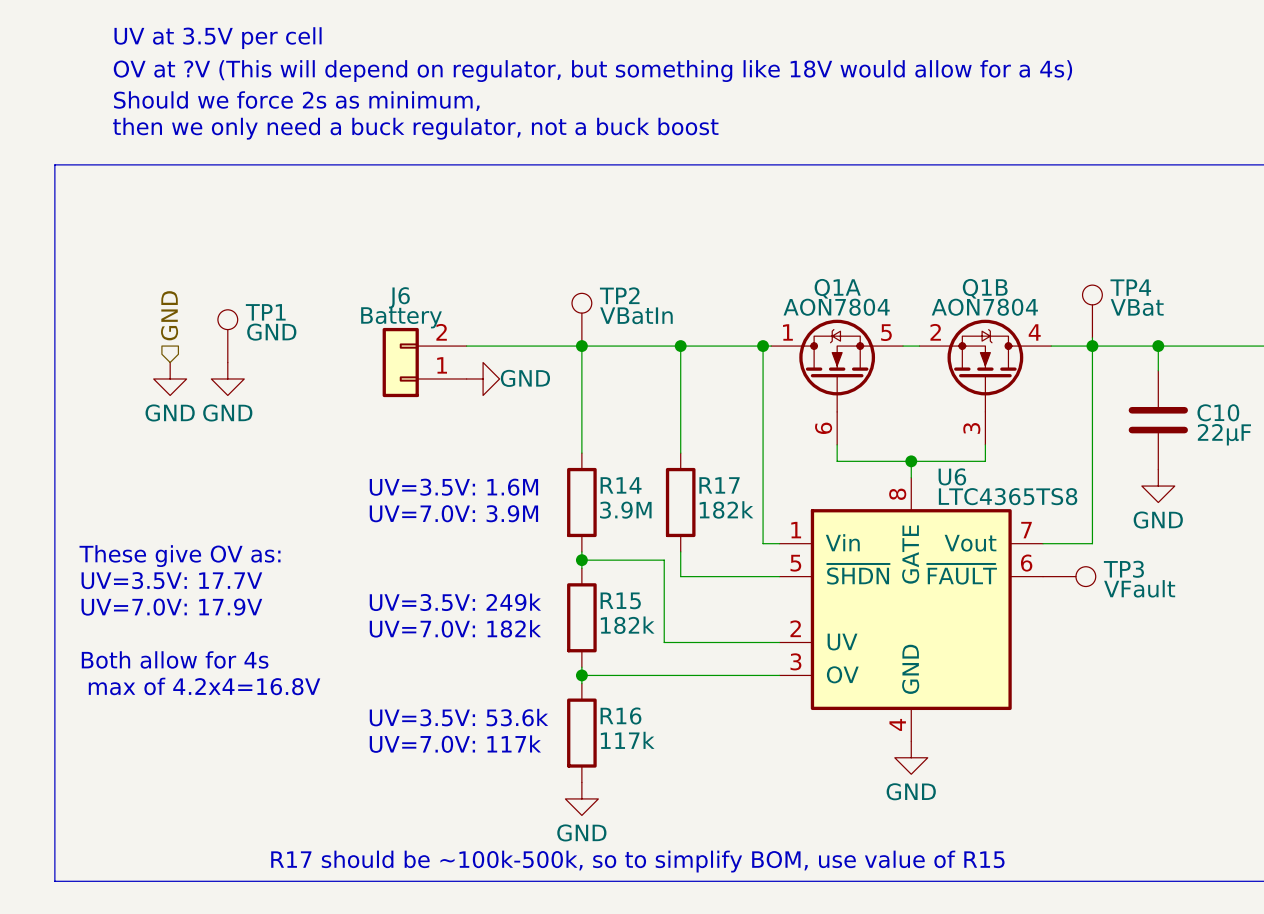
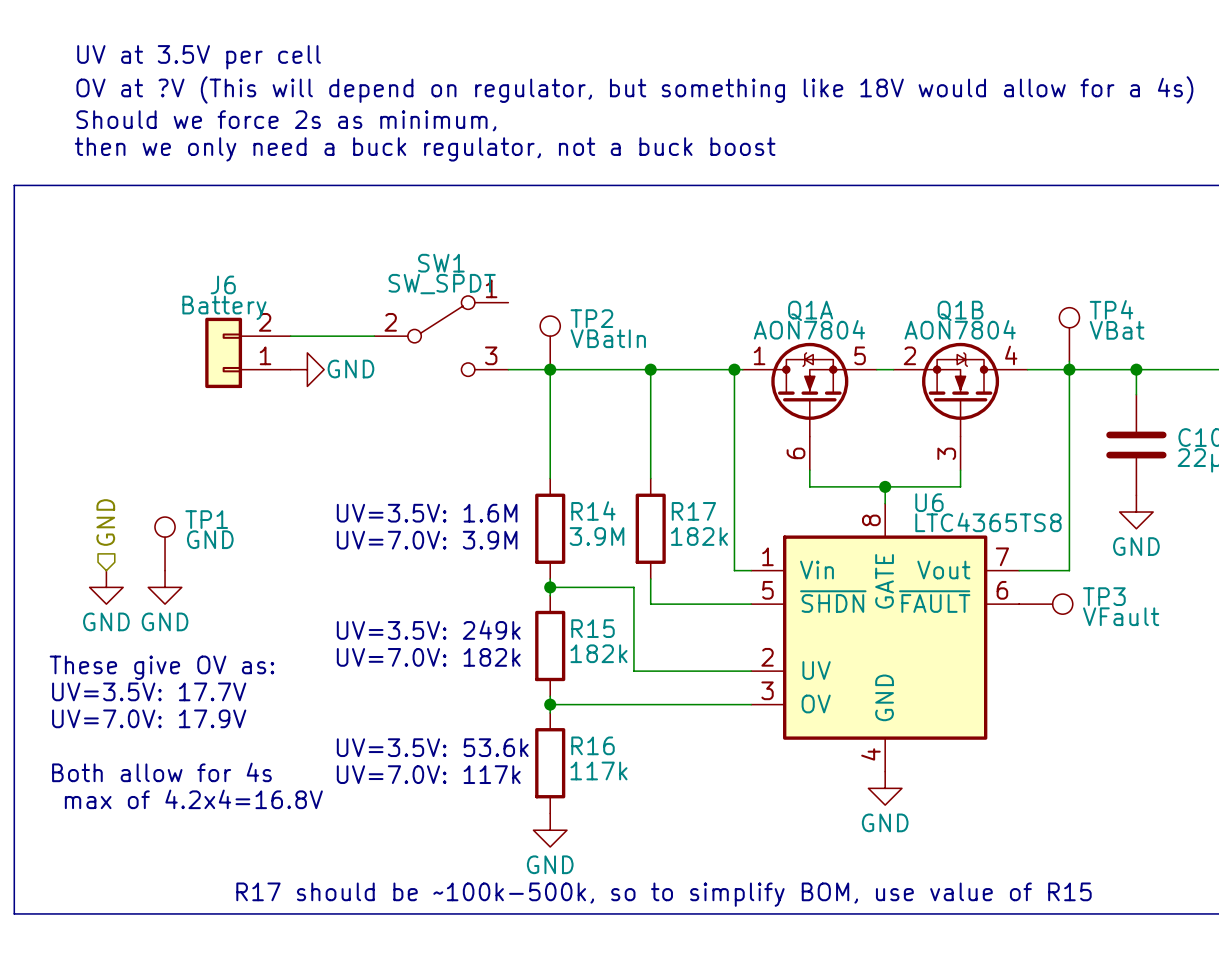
wire: none -> (290, 336) (374, 336)
SW1: none -> SW_SPDT (441, 336)
hierarchical label position: GND (169, 315) -> GND (105, 522)
TP1 position: (227, 336) -> (165, 543)
power symbol: none -> GND (307, 369)
wire: (466, 346) (540, 346) -> none
J6 position: (424, 362) -> (247, 352)
power symbol: GND (170, 378) -> none
power symbol: GND (227, 378) -> none
power symbol: GND (483, 378) -> none
text position: These give OV as: (180, 556) -> These give OV as: (161, 667)
power symbol: none -> GND (106, 587)
power symbol: none -> GND (165, 587)
text position: UV=3.5V: 17.7V (171, 580) -> UV=3.5V: 17.7V (149, 691)
text position: UV=7.0V: 17.9V (171, 607) -> UV=7.0V: 17.9V (149, 718)
text position: Both allow for 4s (175, 659) -> Both allow for 4s (161, 772)
text position: max of 4.2x4=16.8V (204, 686) -> max of 4.2x4=16.8V (193, 799)

